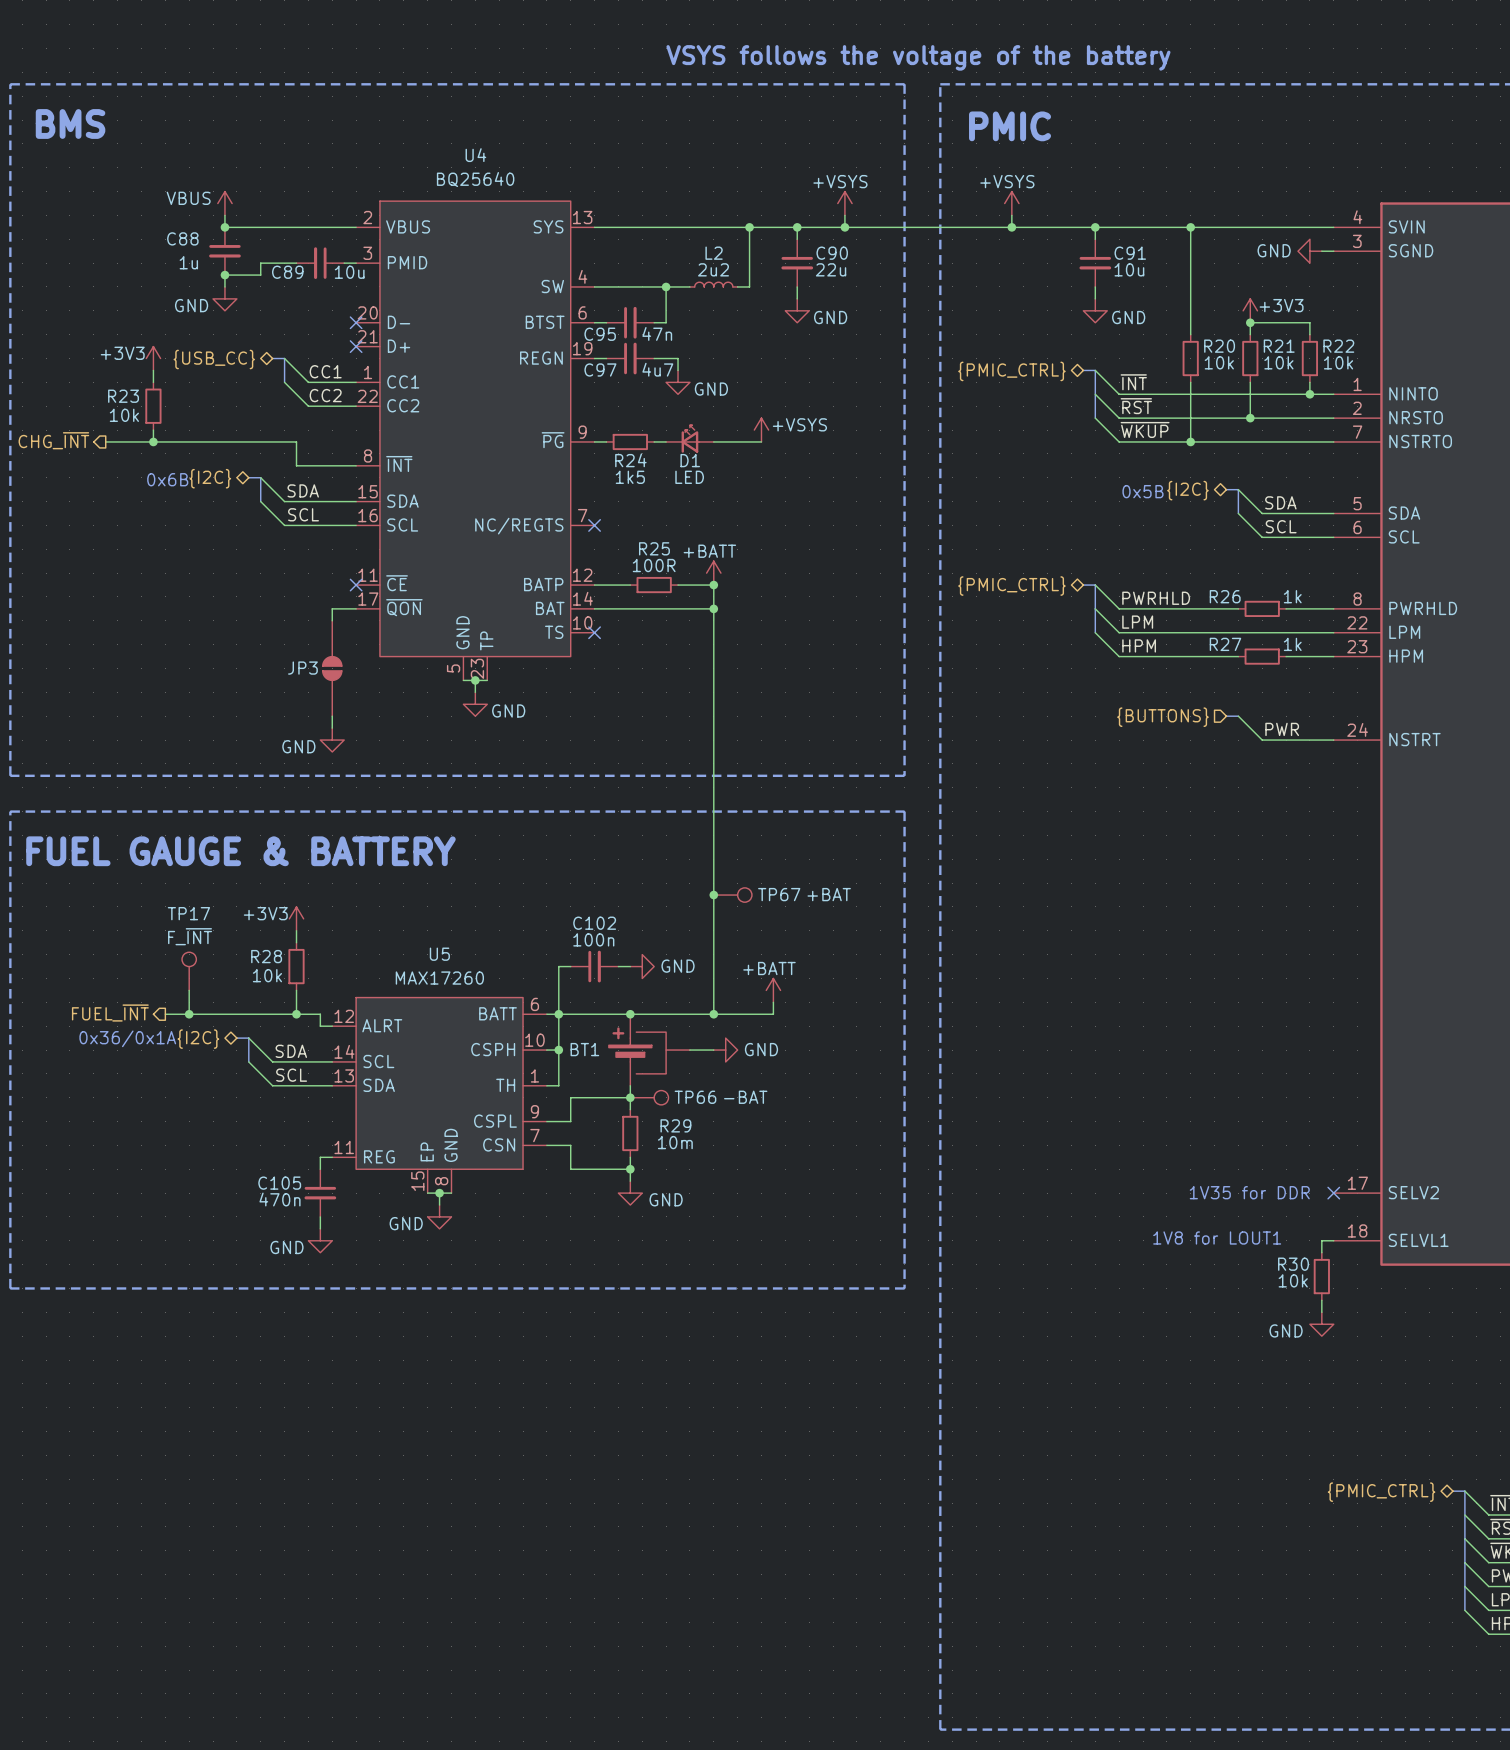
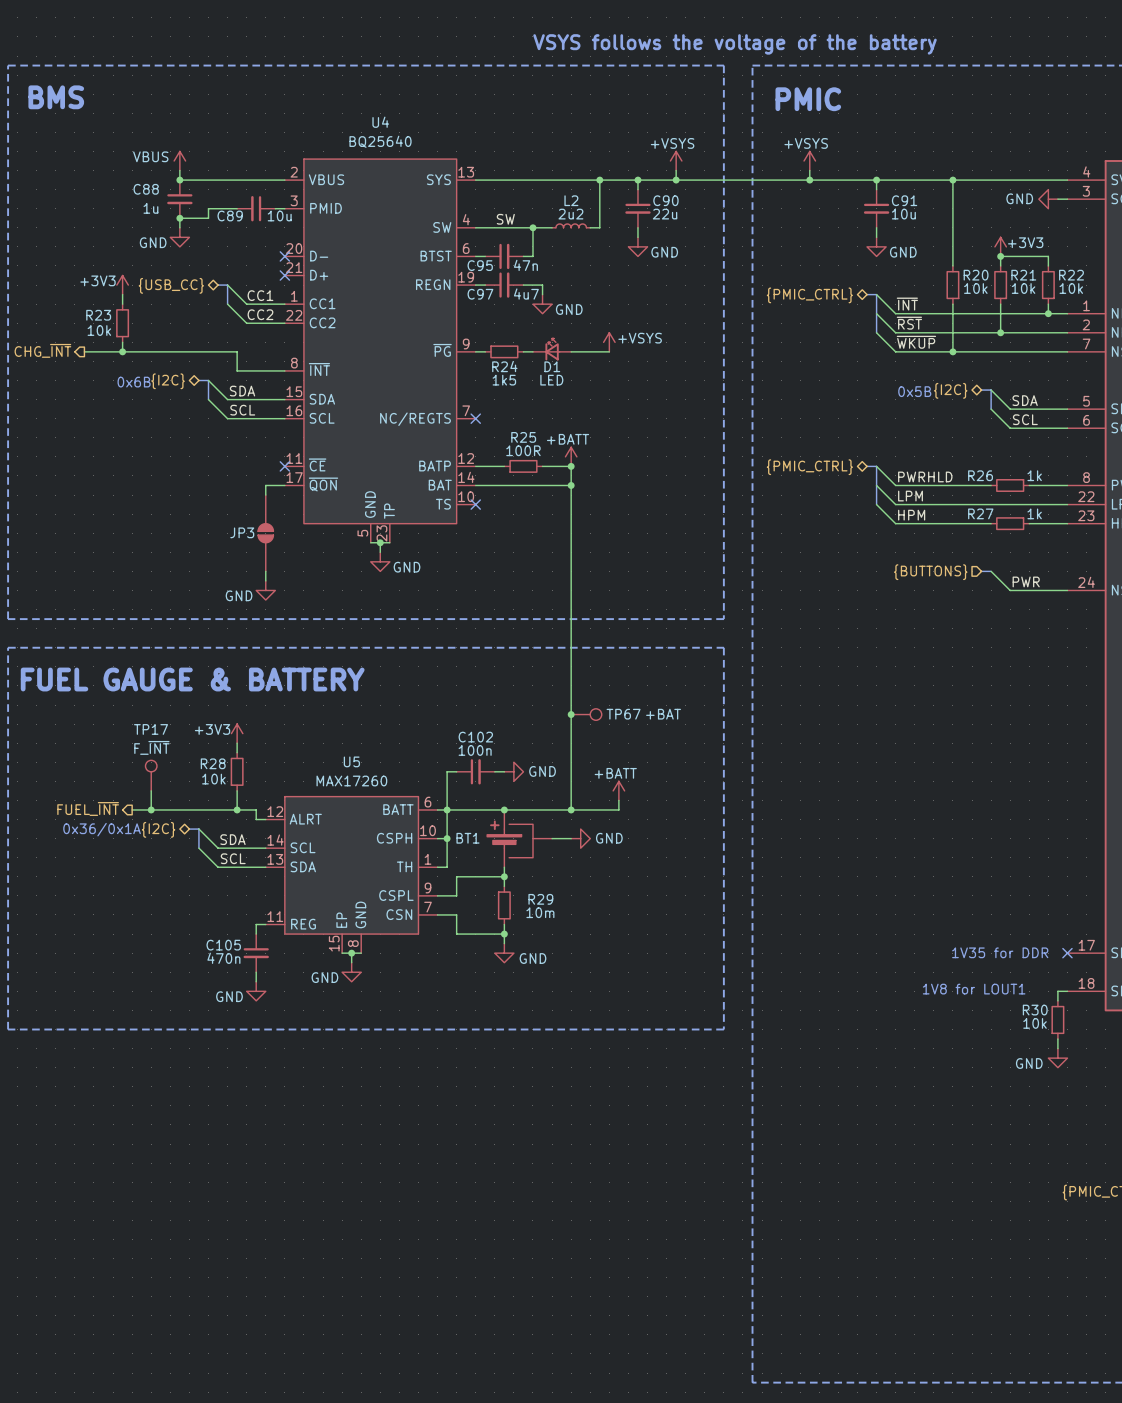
label: none -> SW (505, 219)
TP66: -BAT (649, 1097) -> none

